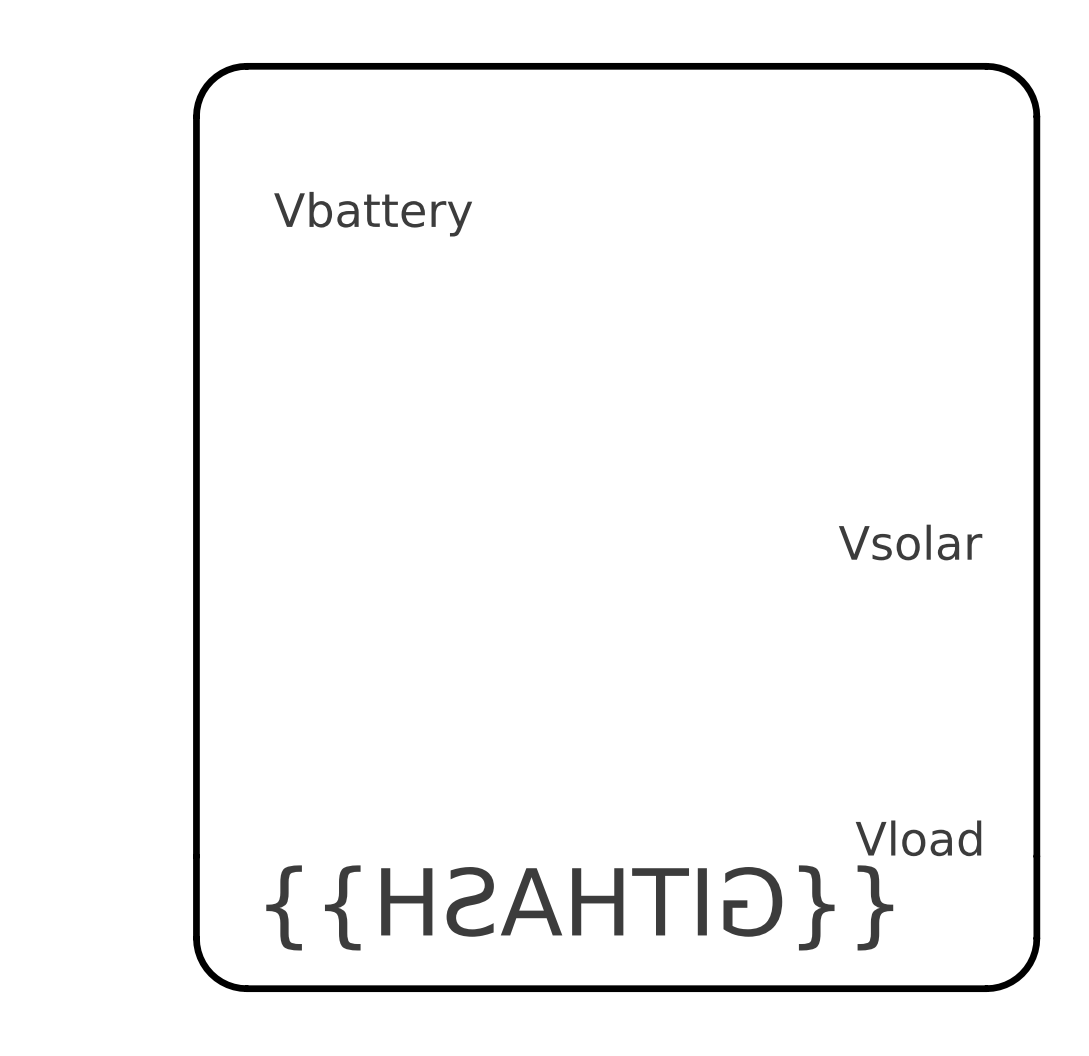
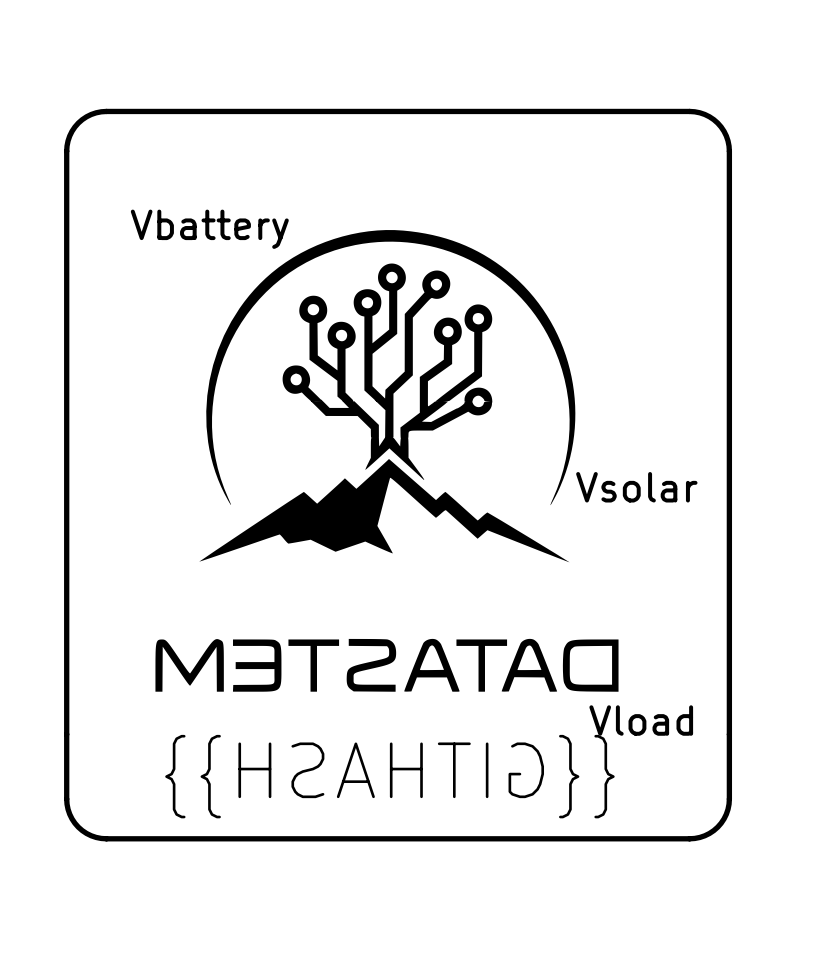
drawing: none -> [199, 230, 576, 563]
drawing: none -> [155, 638, 619, 692]

